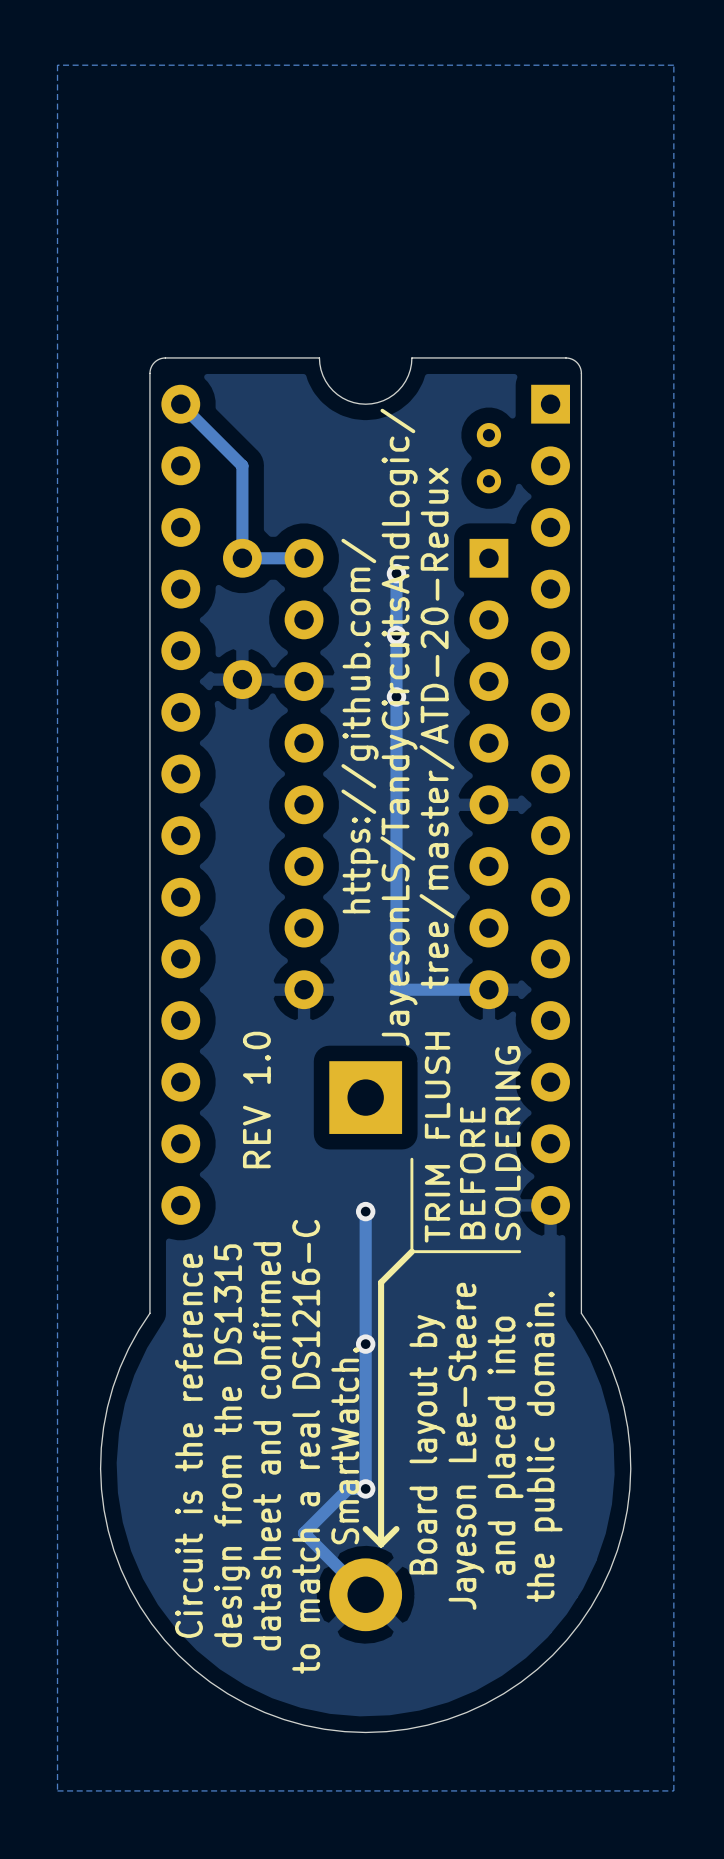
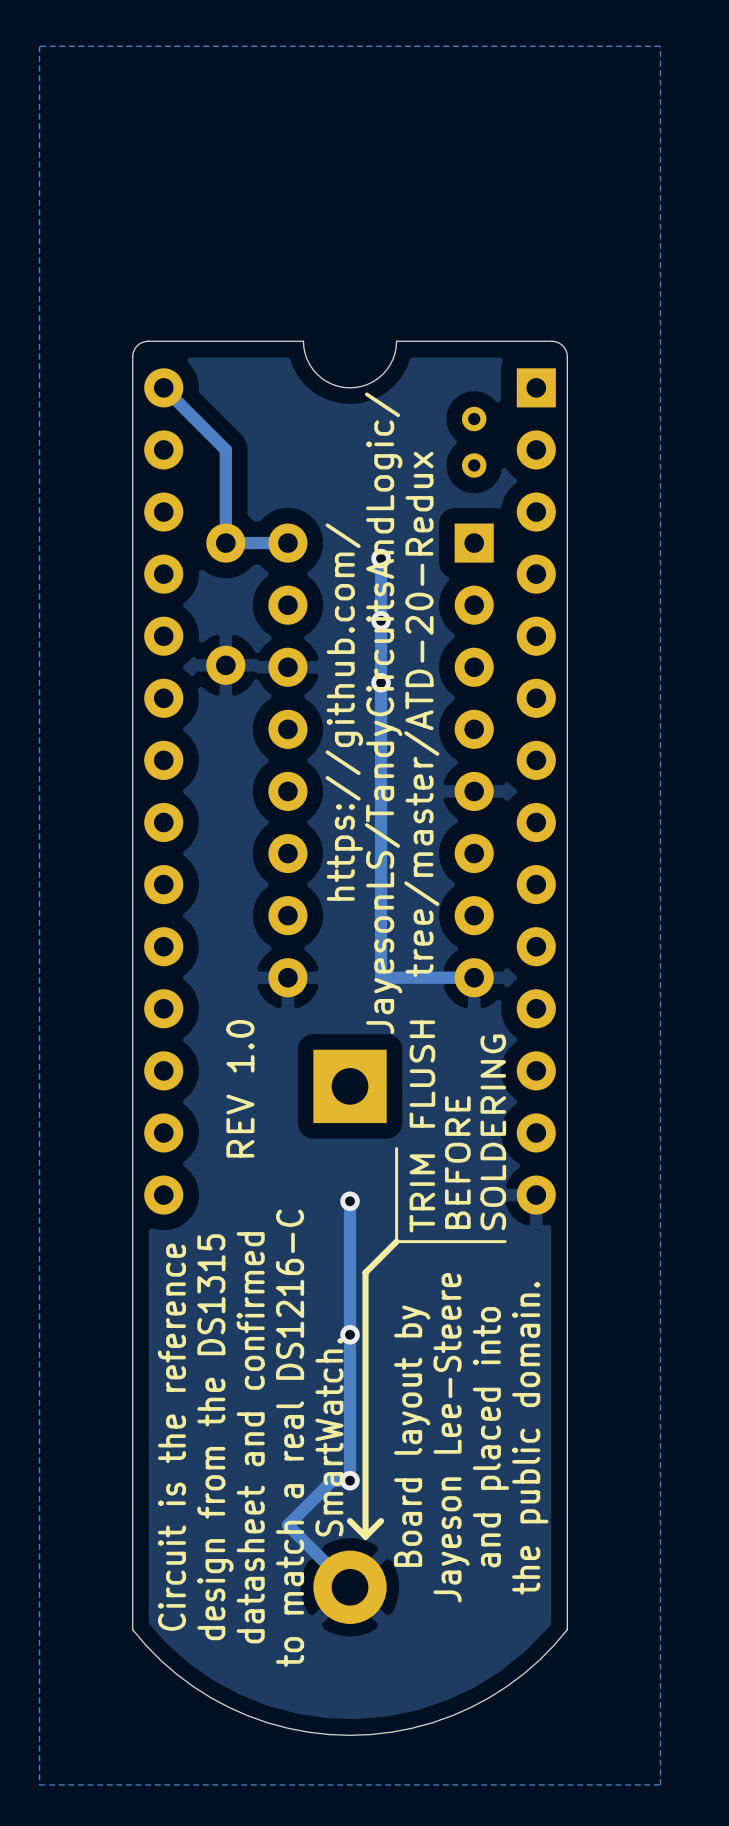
board edge: none -> (132, 1303) (132, 1629)
board edge: (581, 1313) (602, 1348) (618, 1387) (627, 1427) (630, 1448) (629, 1489) (623, 1530) (610, 1569) (601, 1588) (579, 1623) (552, 1655) (537, 1669) (503, 1693) (466, 1712) (427, 1725) (407, 1729) (365, 1732) (344, 1731) (304, 1725) (264, 1712) (227, 1693) (194, 1669) (164, 1640) (151, 1623) (129, 1588) (113, 1550) (104, 1510) (101, 1489) (101, 1448) (107, 1407) (120, 1367) (128, 1348) (149, 1313) -> (567, 1303) (567, 1629) (539, 1660) (523, 1674) (489, 1697) (451, 1715) (432, 1722) (391, 1732) (370, 1734) (350, 1735) (308, 1732) (267, 1722) (229, 1707) (210, 1697) (193, 1686) (160, 1660) (132, 1629)

